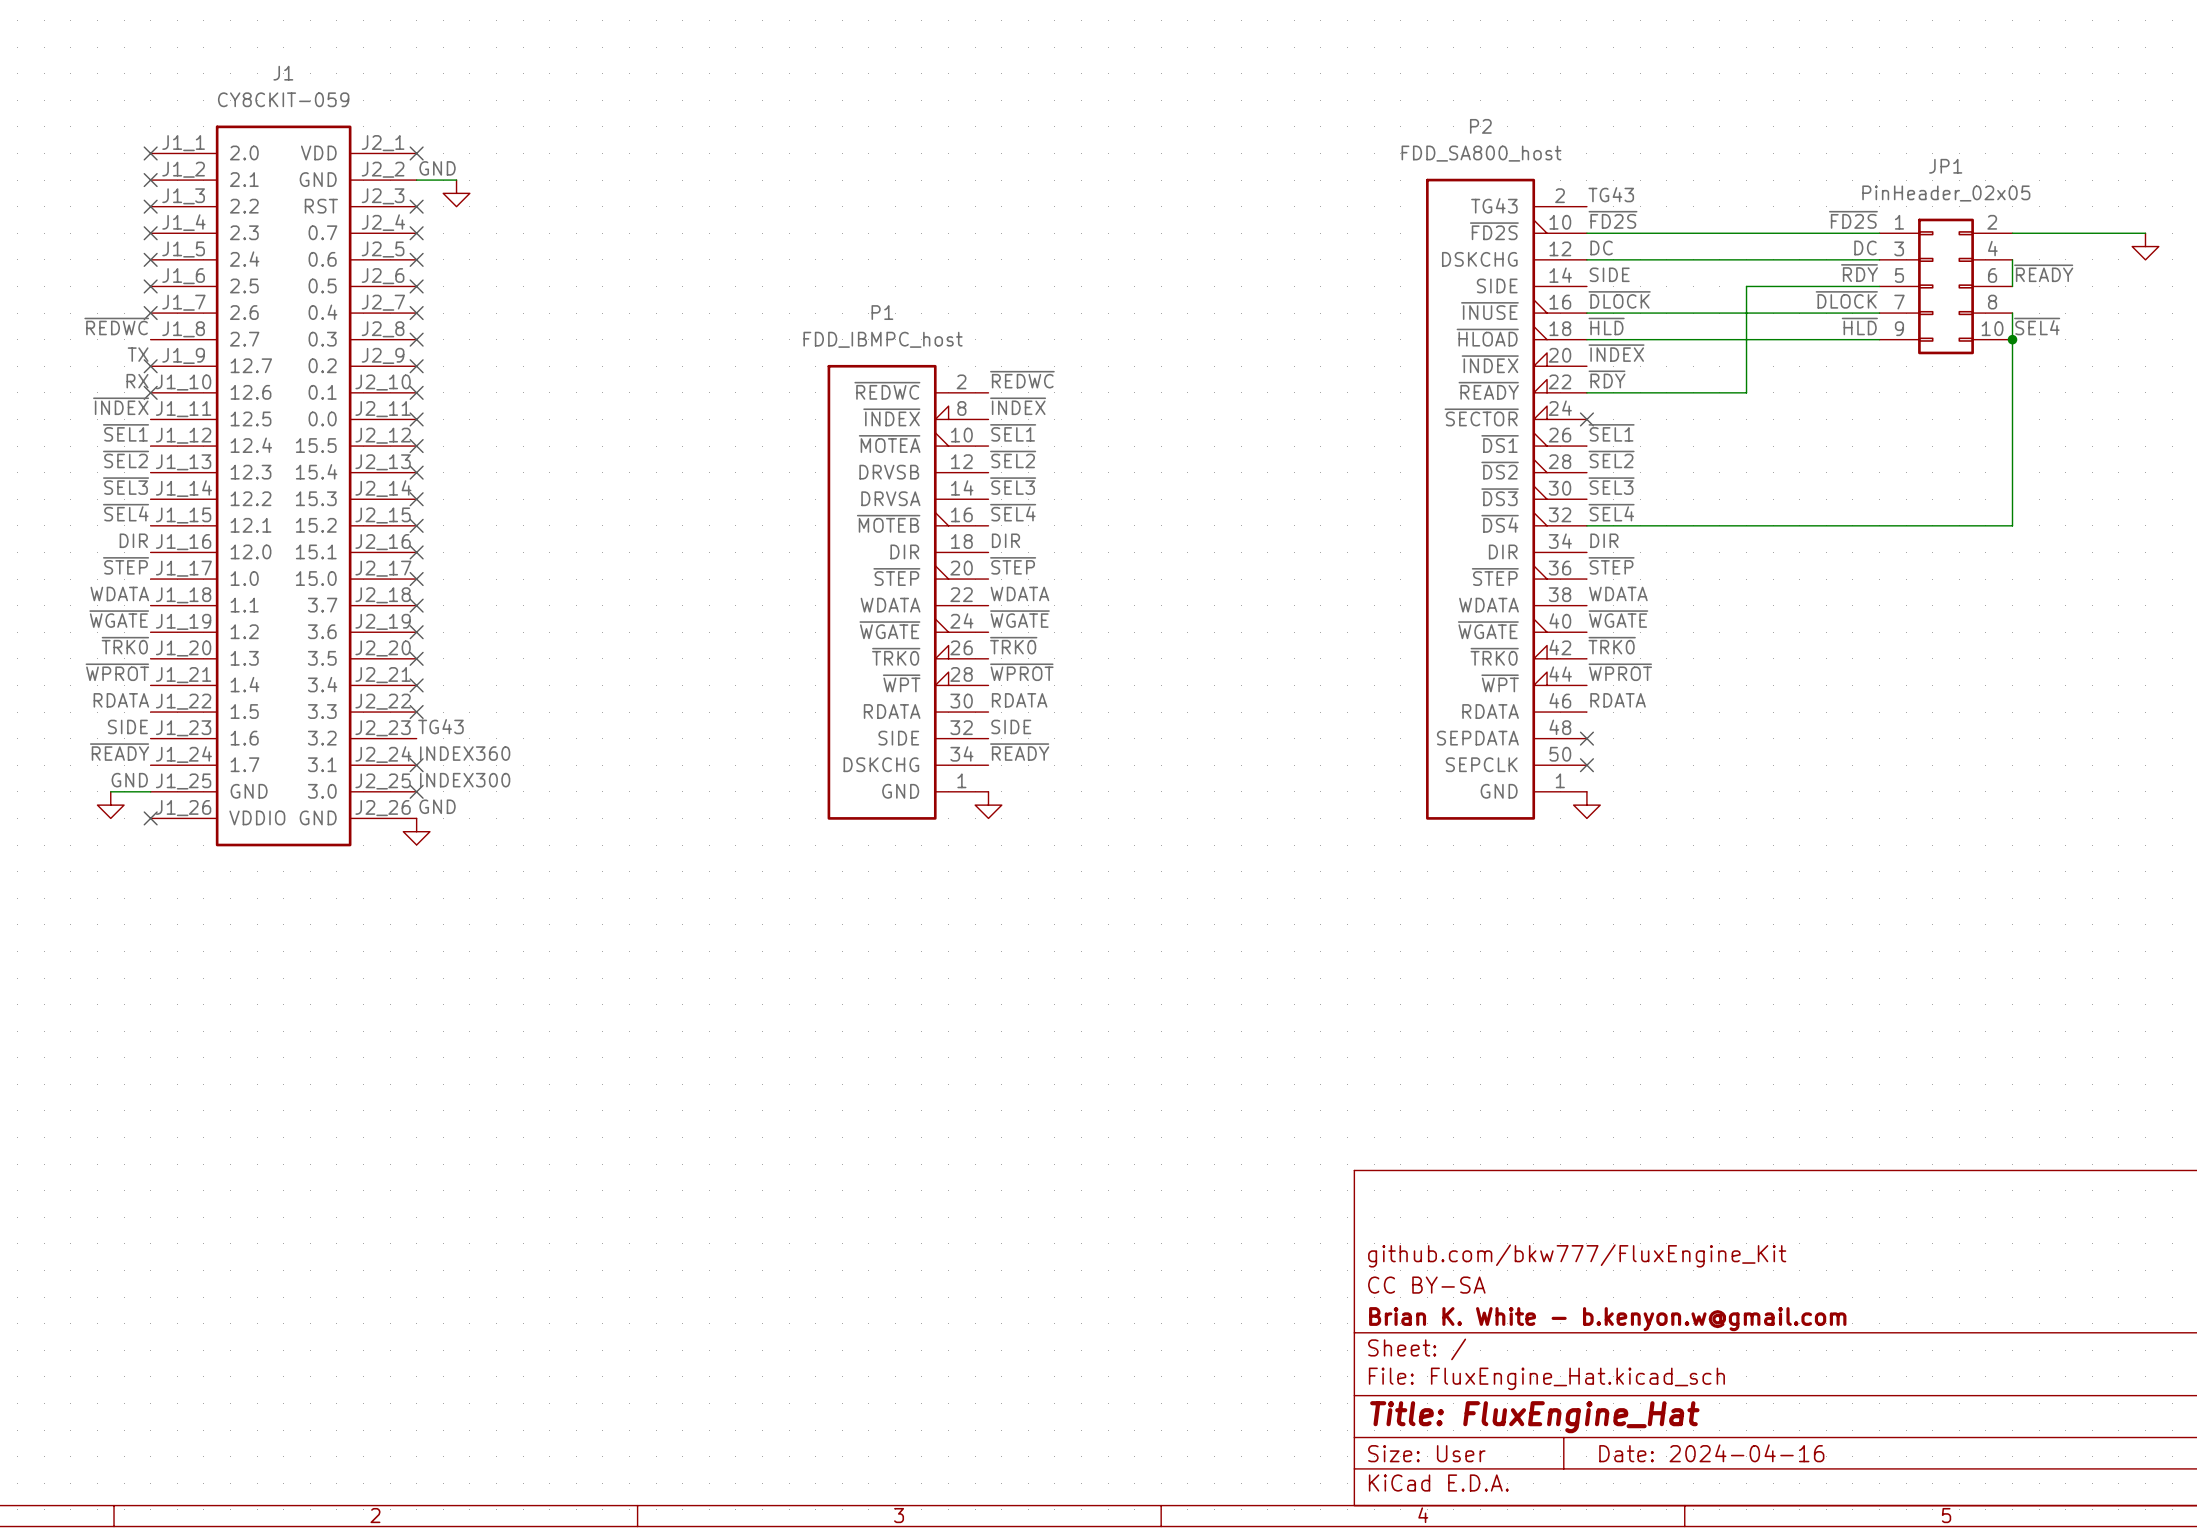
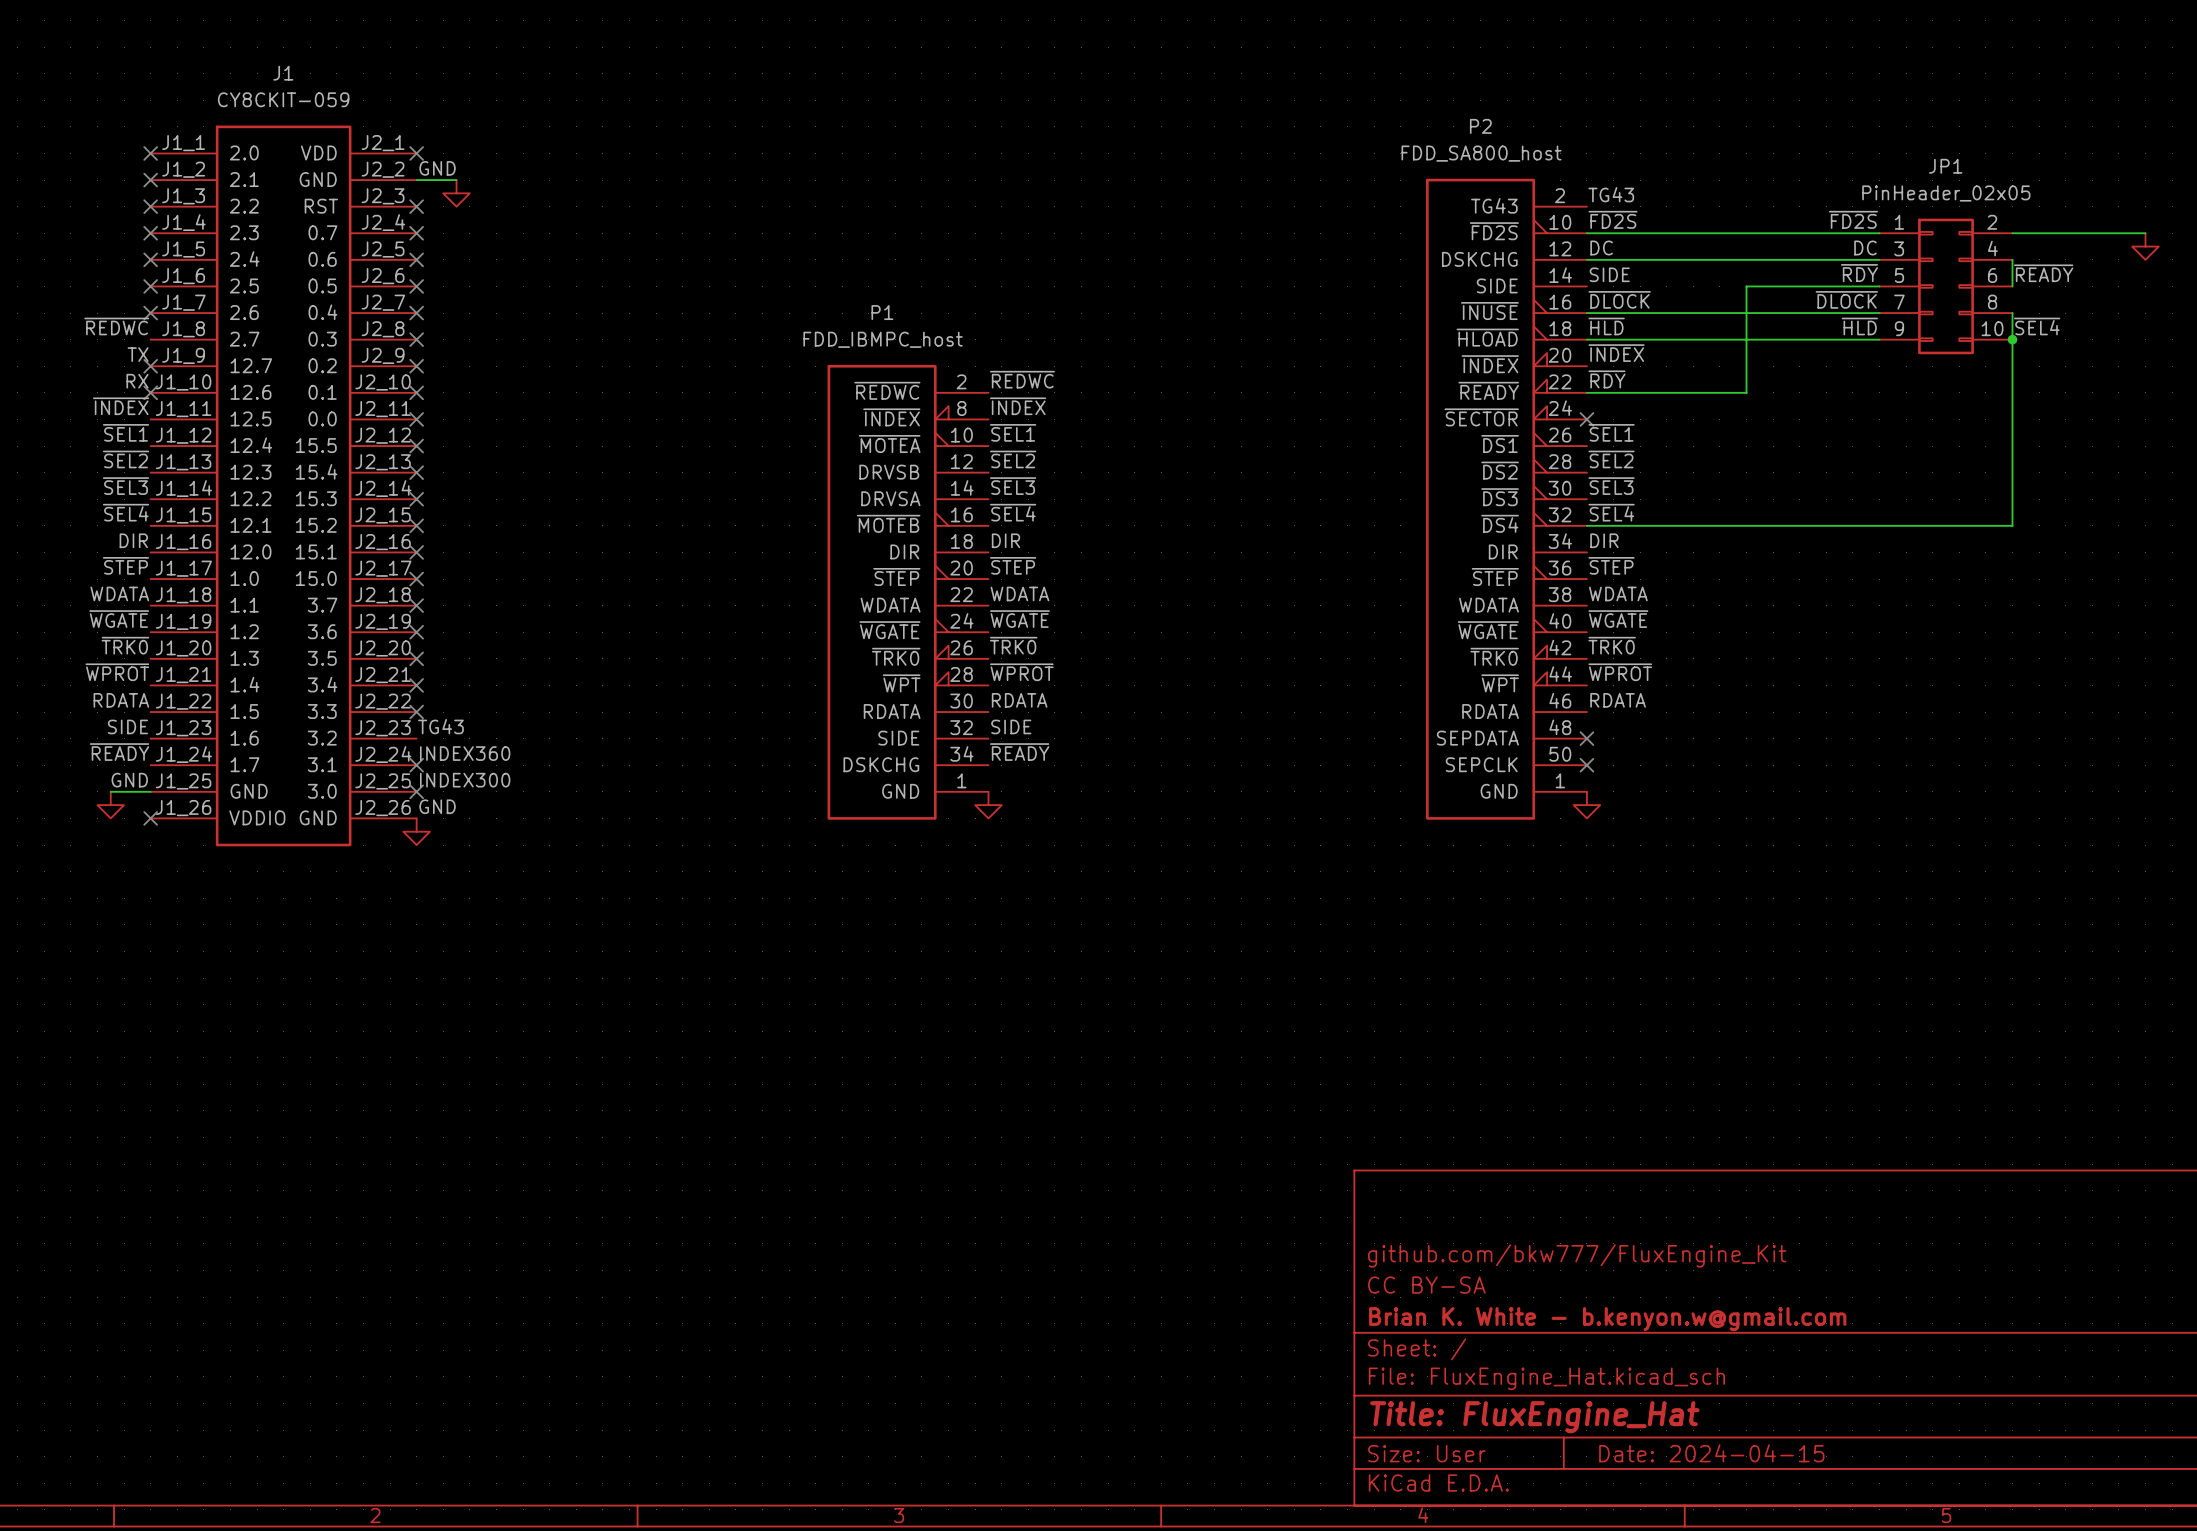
title block: Date: 2024-04-16 (1711, 1453) -> Date: 2024-04-15 (1711, 1453)

